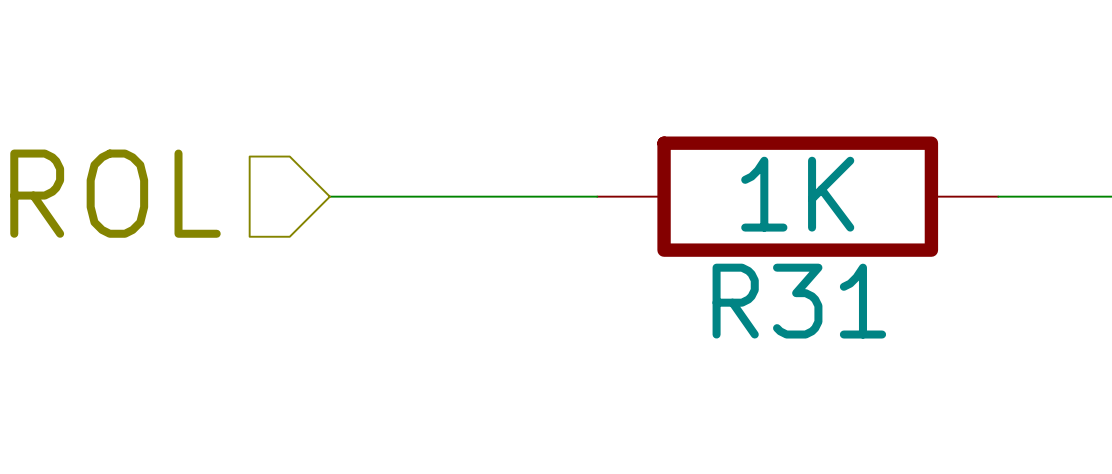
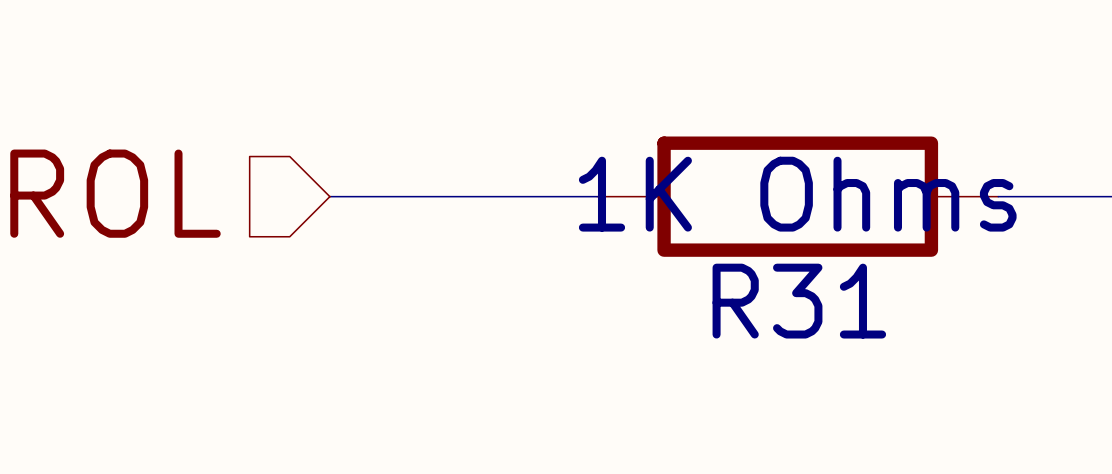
R31 value: 1K (797, 194) -> 1K Ohms (797, 194)

